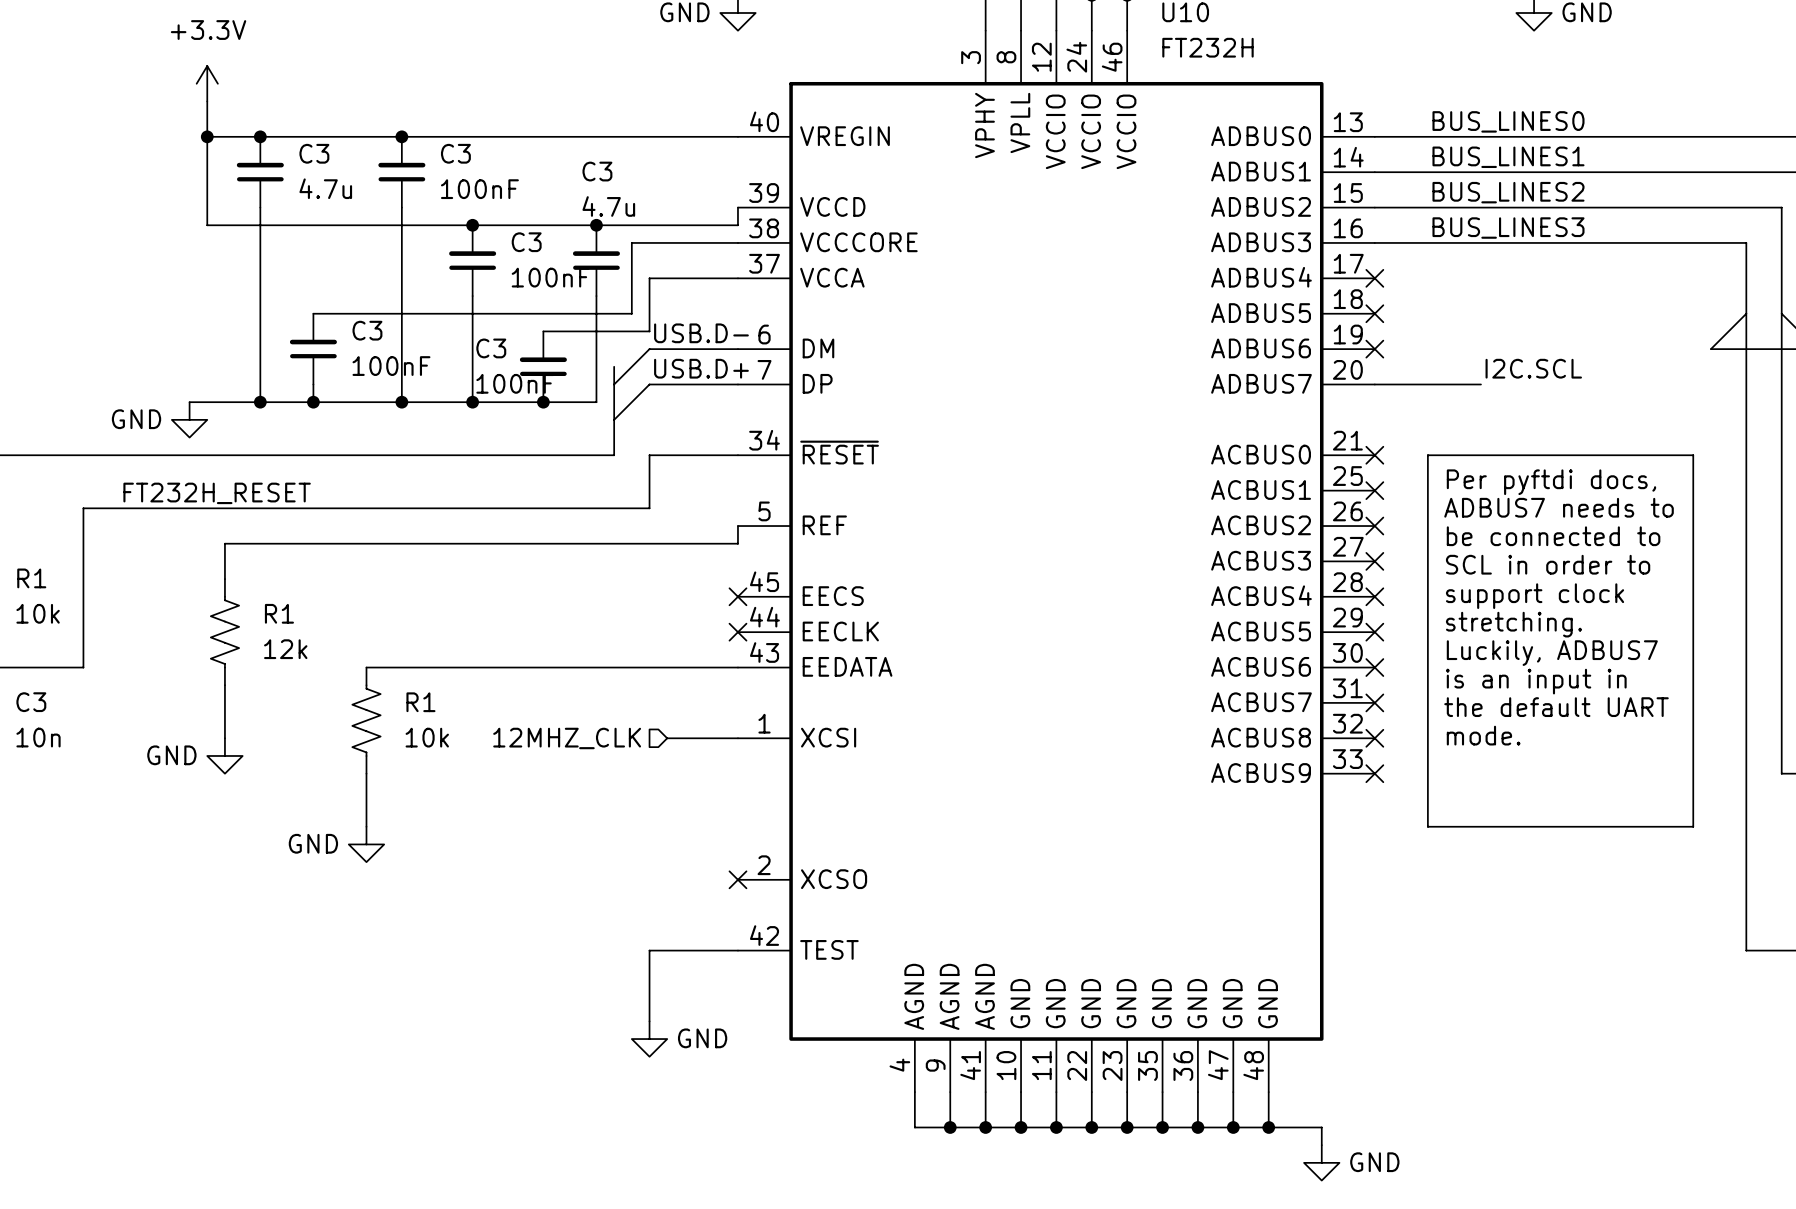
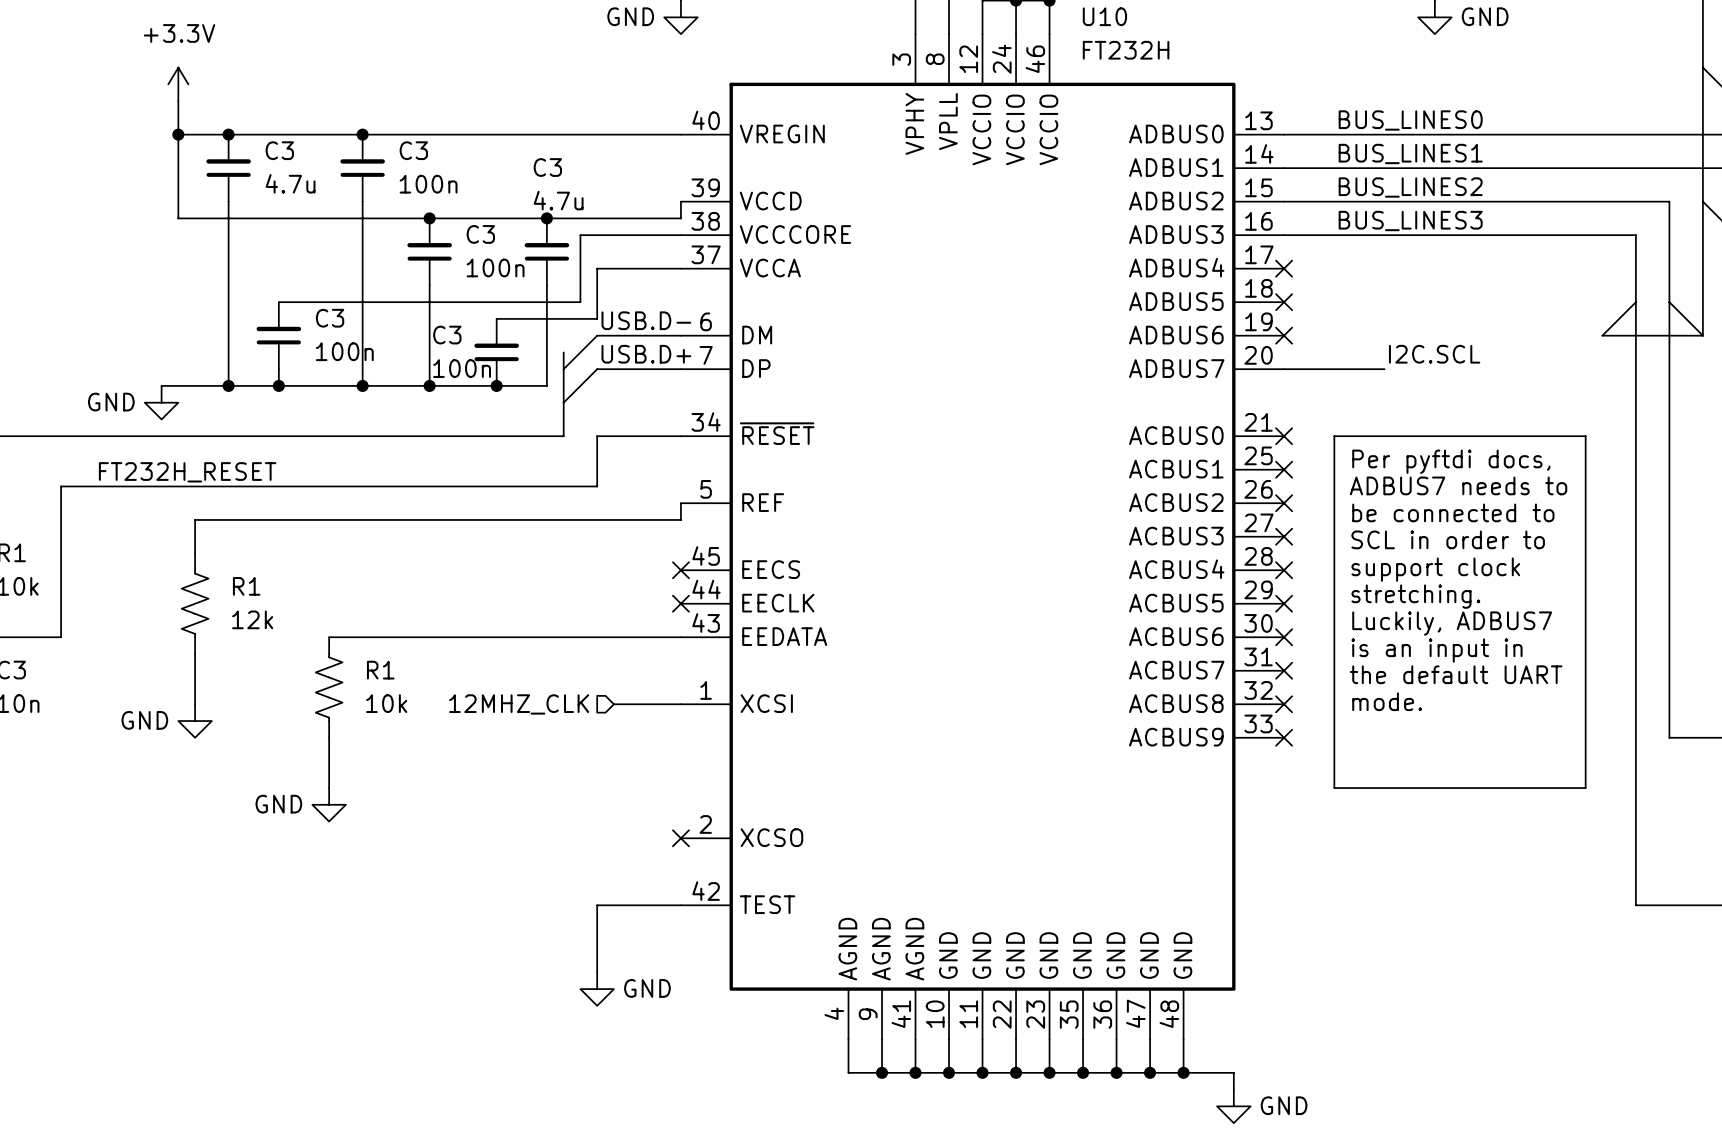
C3 value: 100nF (479, 189) -> 100n (428, 184)
C3 value: 100nF (550, 277) -> 100n (495, 267)
C3 value: 100nF (391, 366) -> 100n (344, 351)
C3 value: 100nF (515, 383) -> 100n (462, 368)

